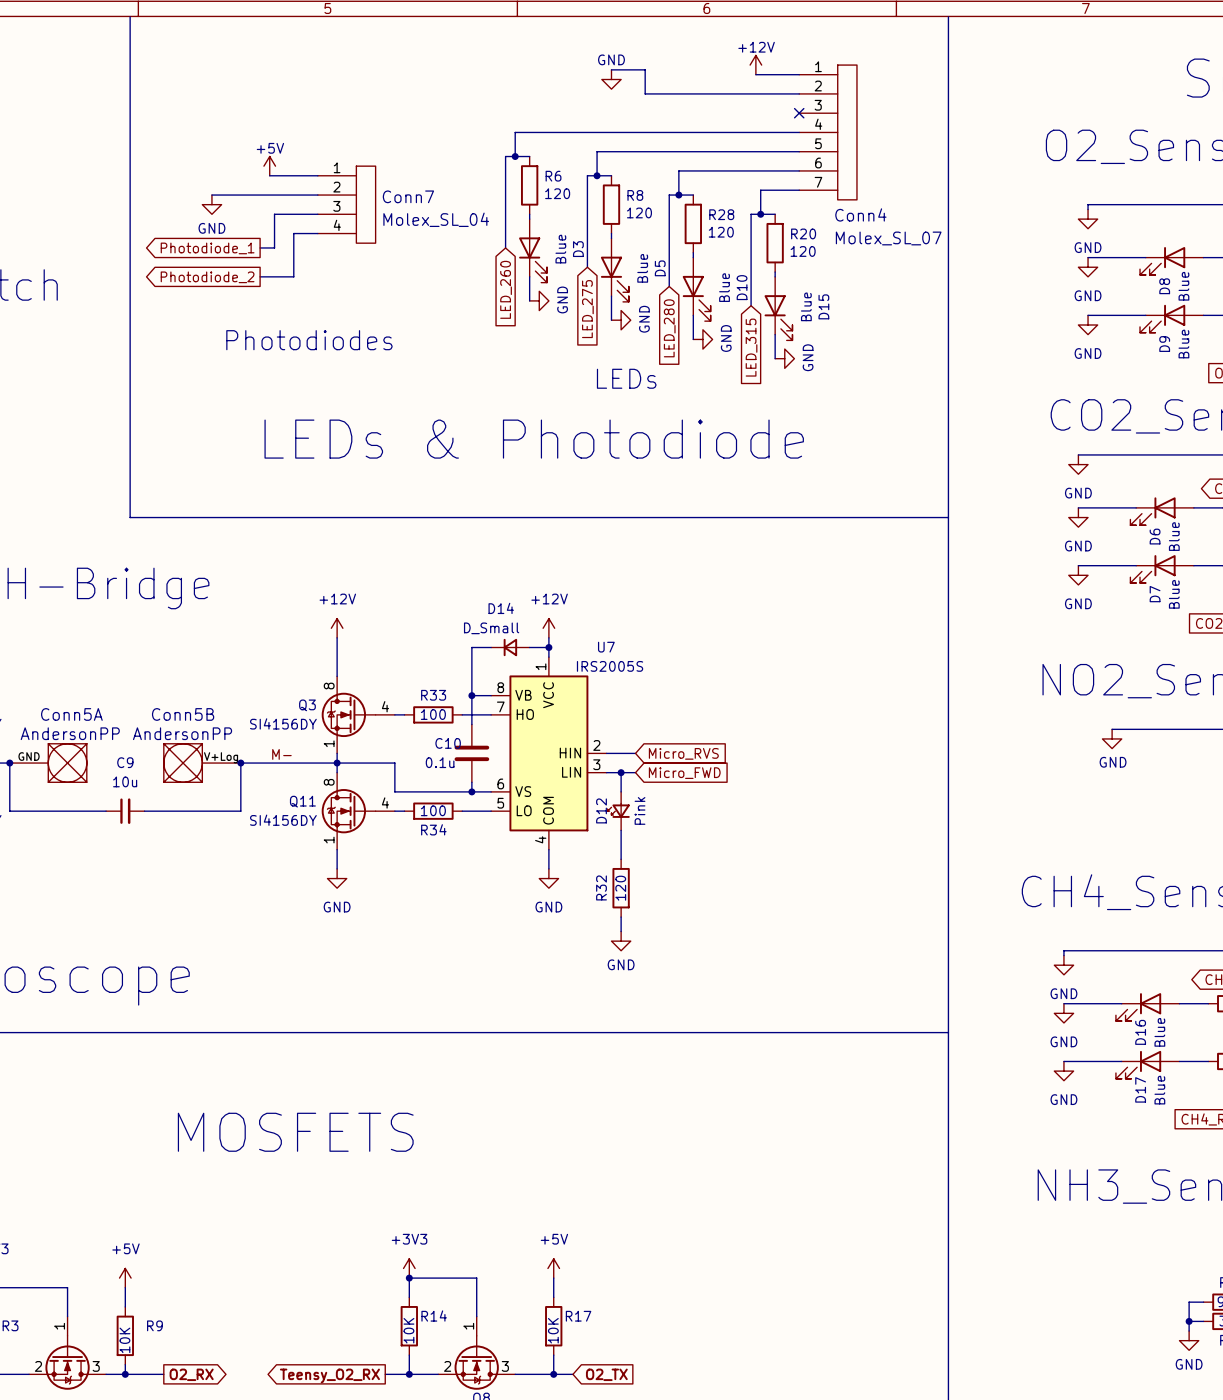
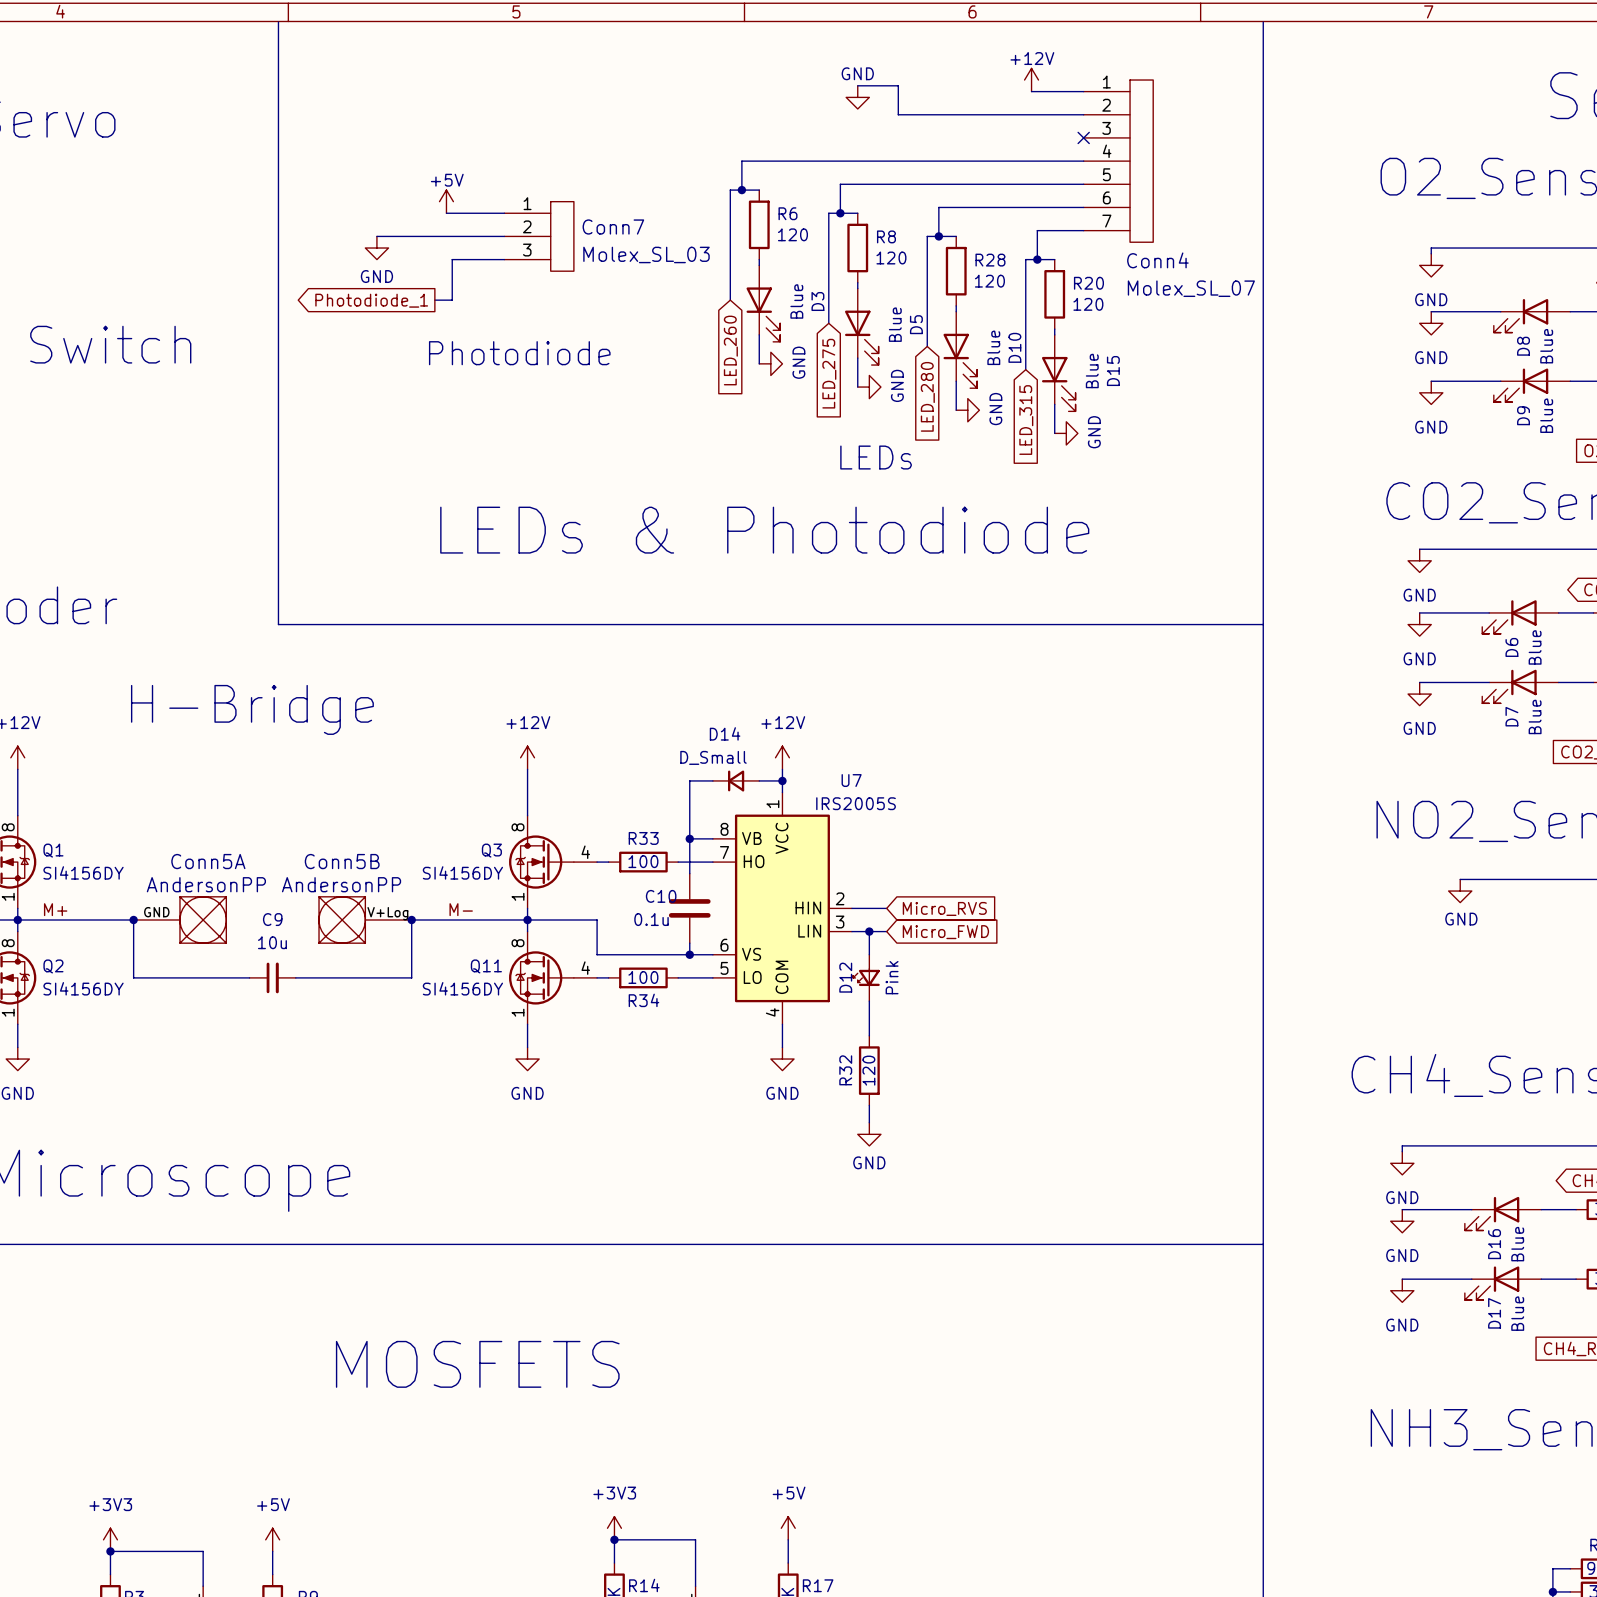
Conn7 symbol: [317, 166, 376, 244] -> [504, 201, 574, 272]
Conn7 value: Molex_SL_04 (436, 219) -> Molex_SL_03 (646, 254)
wire: (317, 233) (293, 233) (293, 276) (260, 276) -> none
global label: Photodiode_2 (207, 277) -> none
text: none -> Photodiode (519, 353)
text: Photodiodes (309, 340) -> none

